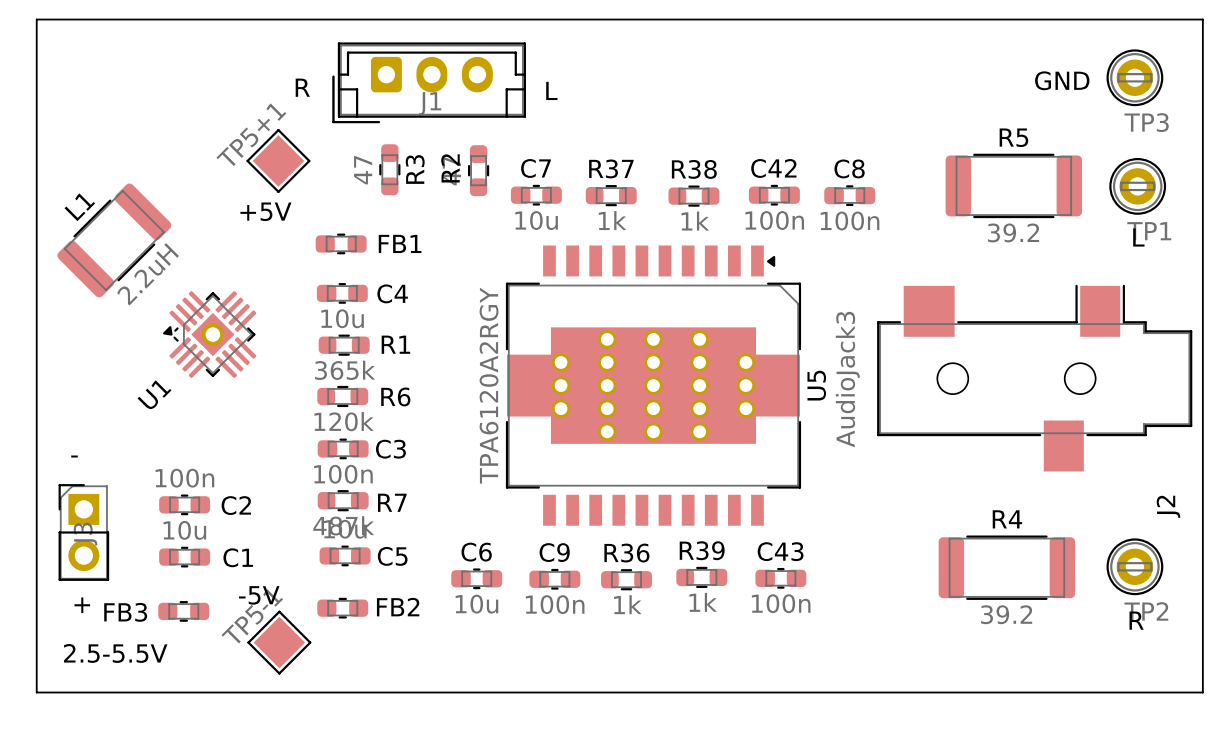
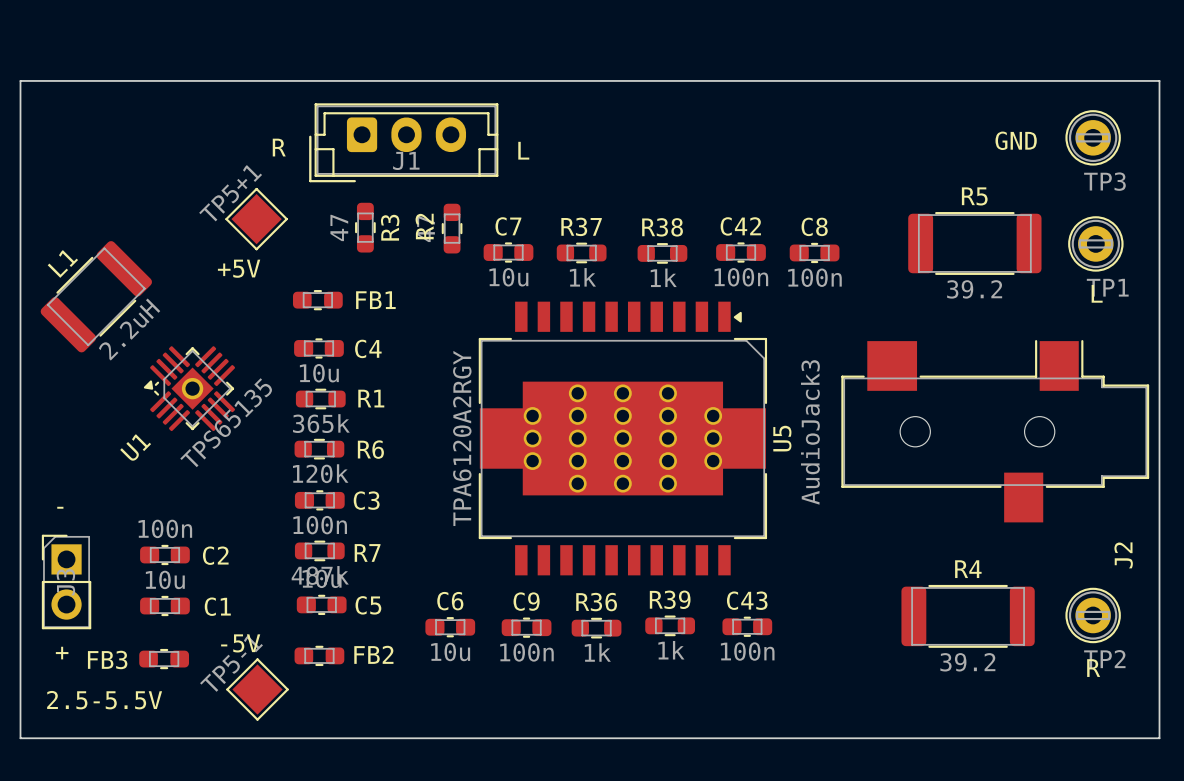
U1 value: none -> TPS65135 (226, 422)

